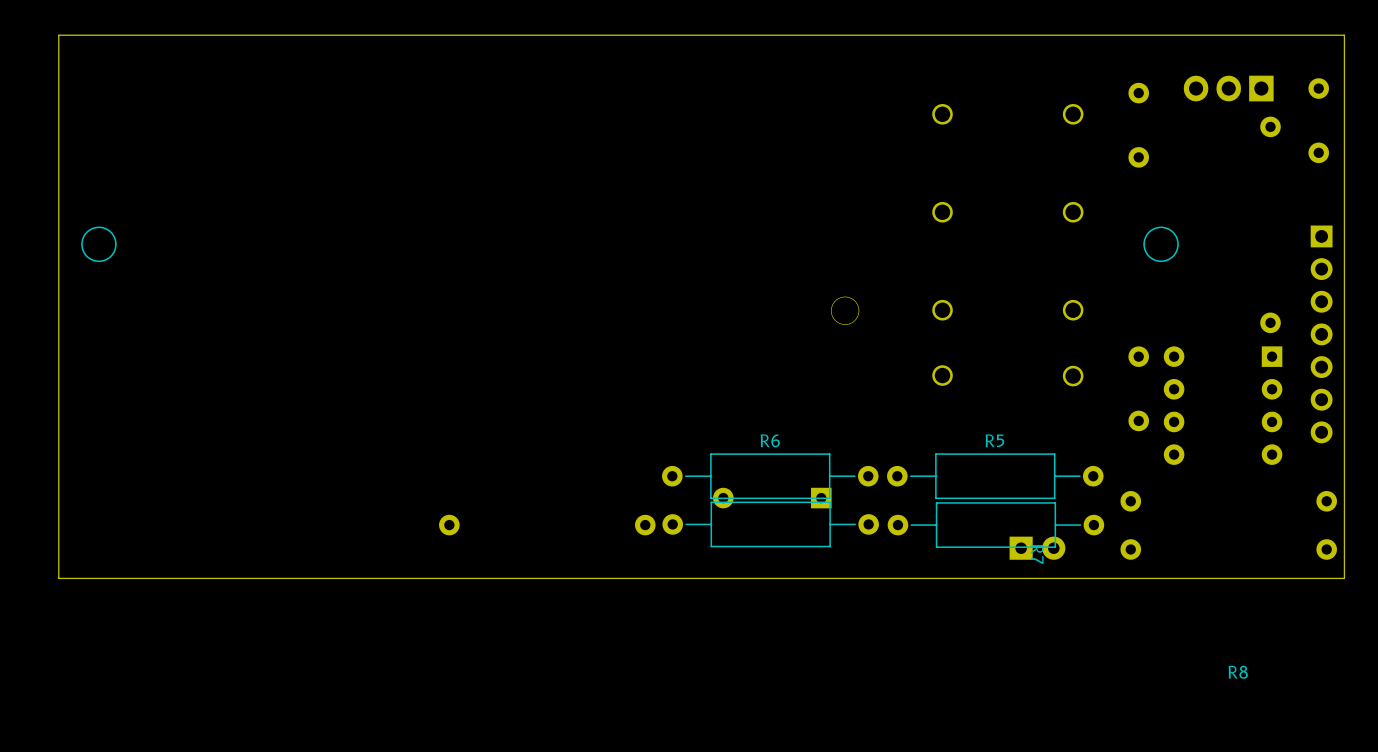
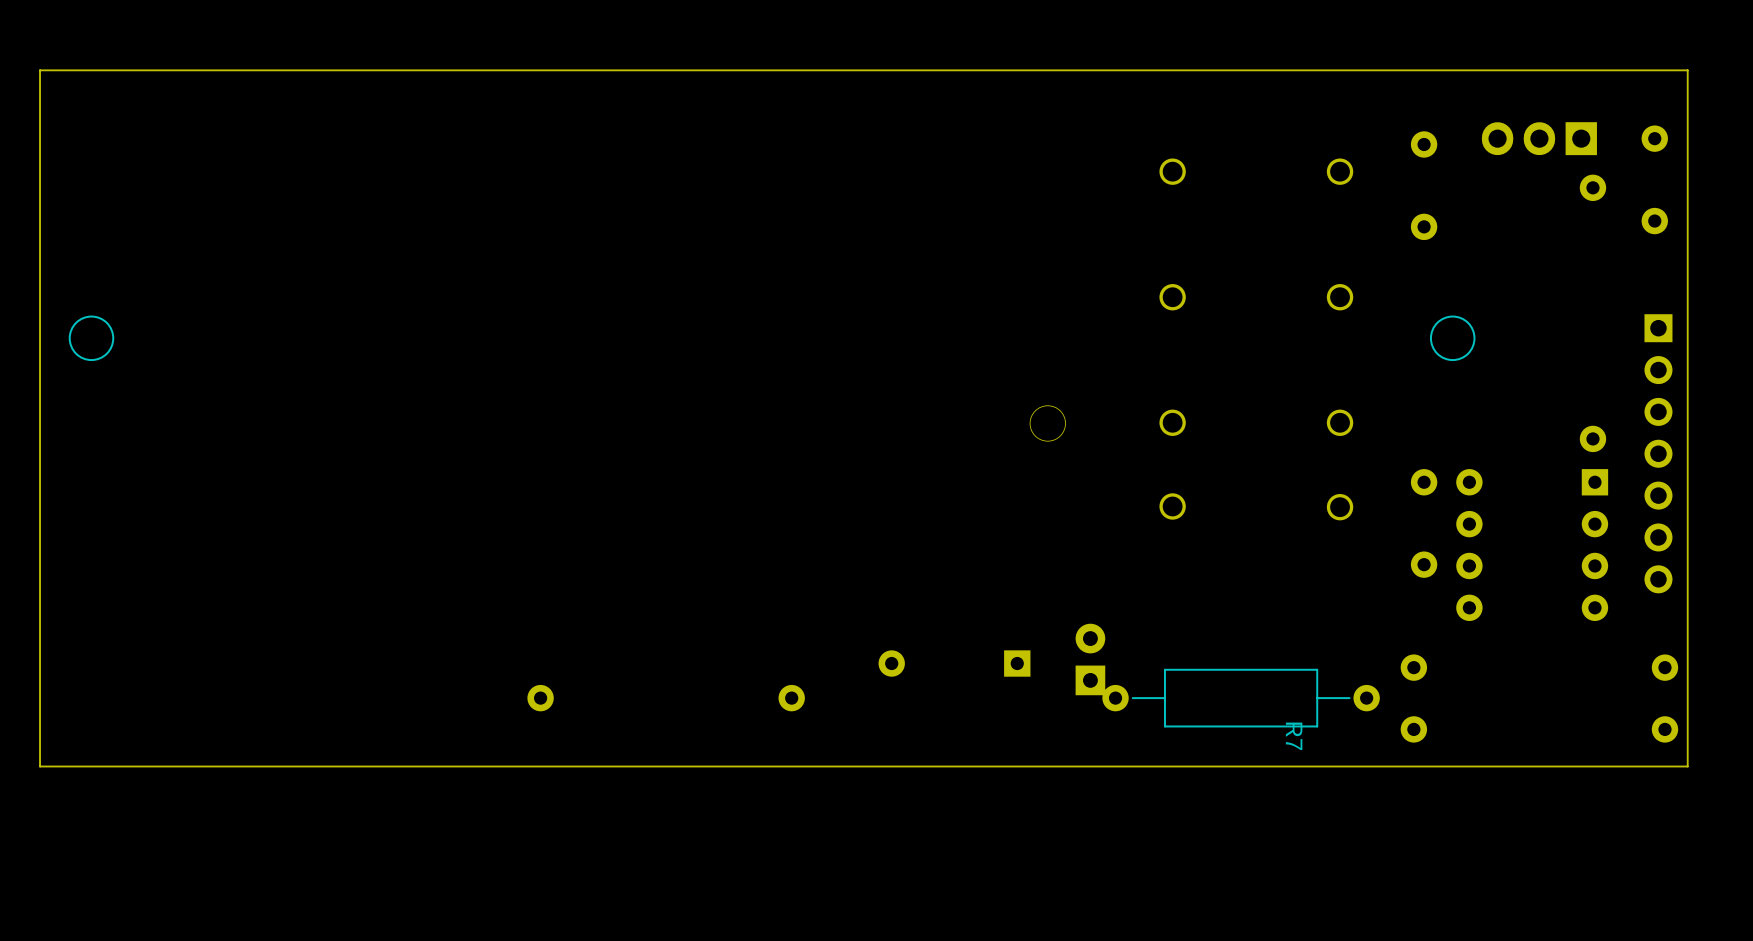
R6: (770, 476) -> none
R5: (995, 476) -> none
R8: (770, 524) -> none
part rotation: 0° (1037, 548) -> 90° counterclockwise (1090, 659)
part position: (1037, 548) -> (1090, 659)

